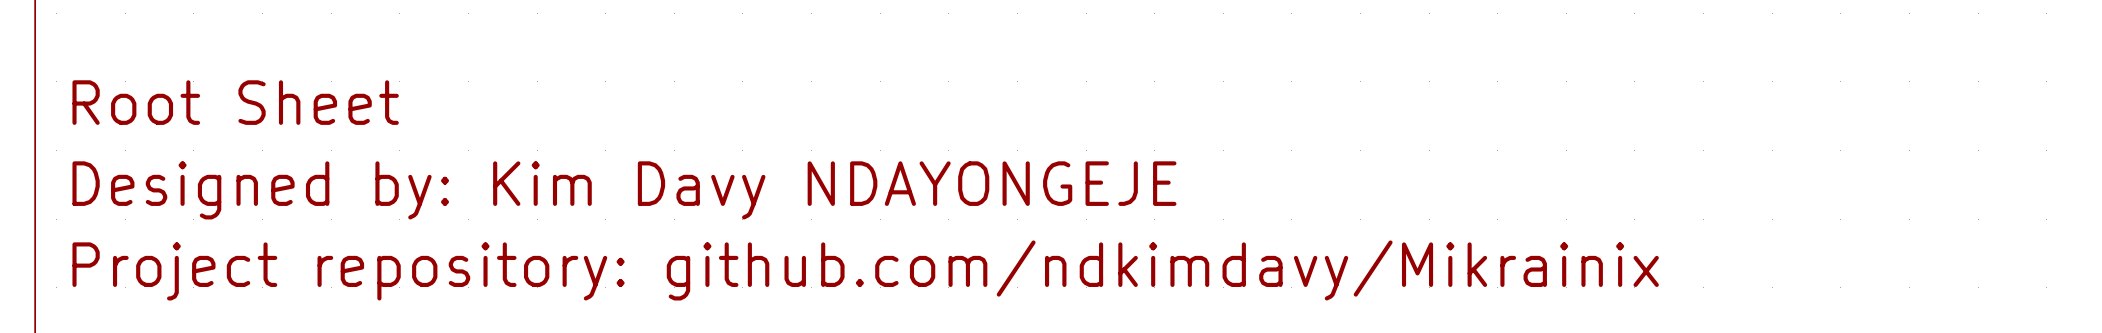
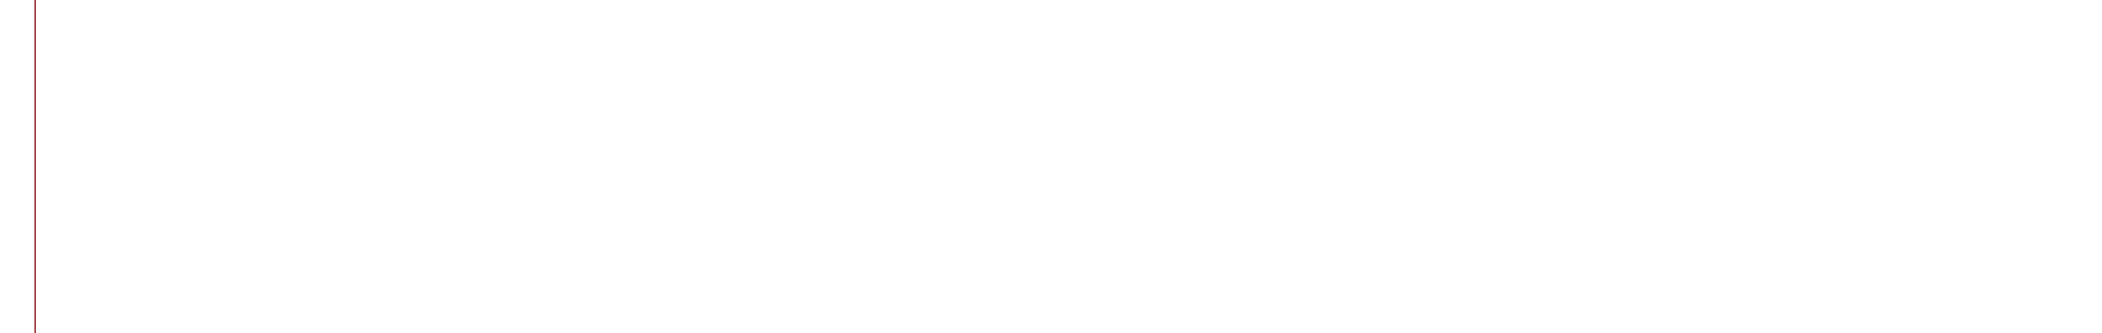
title block: Root Sheet (235, 102) -> none
title block: Designed by: Kim Davy NDAYONGEJE (624, 190) -> none
title block: Project repository: github.com/ndkimdavy/Mikrainix (865, 270) -> none

